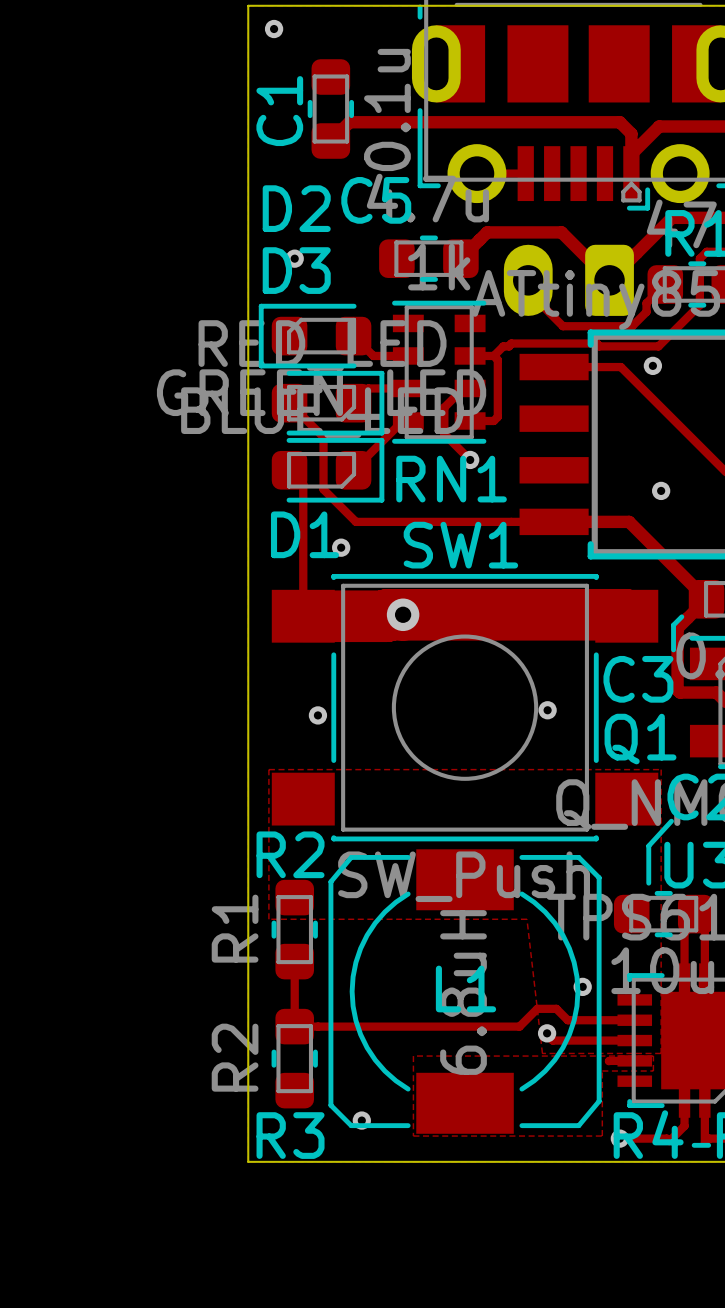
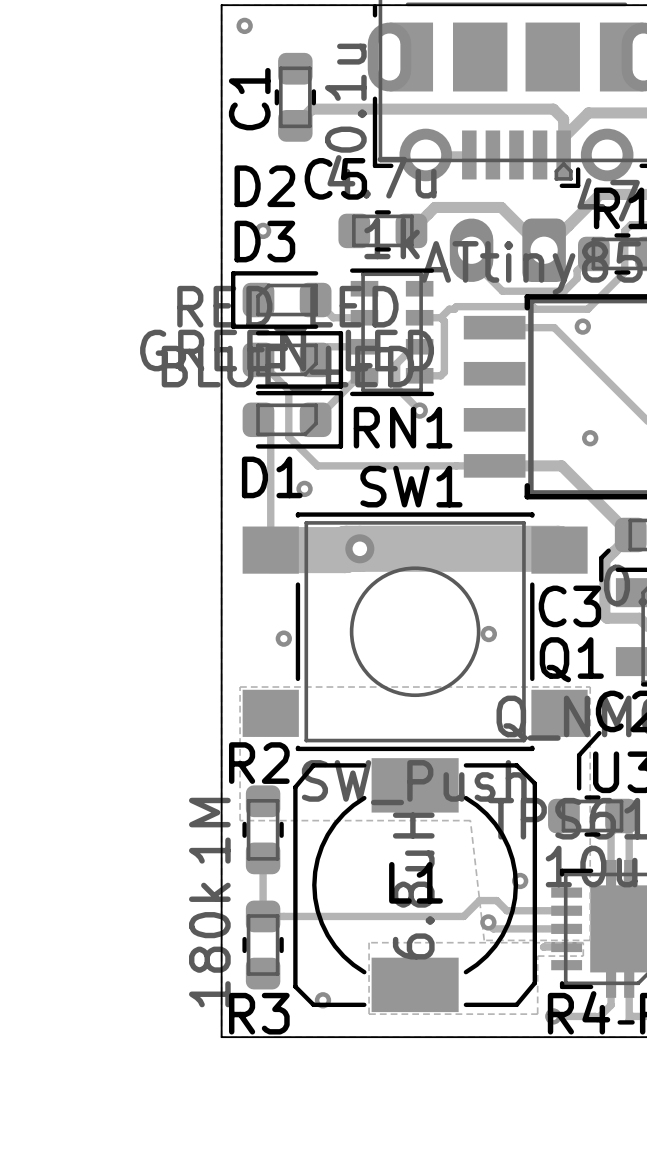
R2 value: R1 (235, 928) -> 1M (209, 830)
R3 value: R2 (235, 1057) -> 180k (209, 945)

